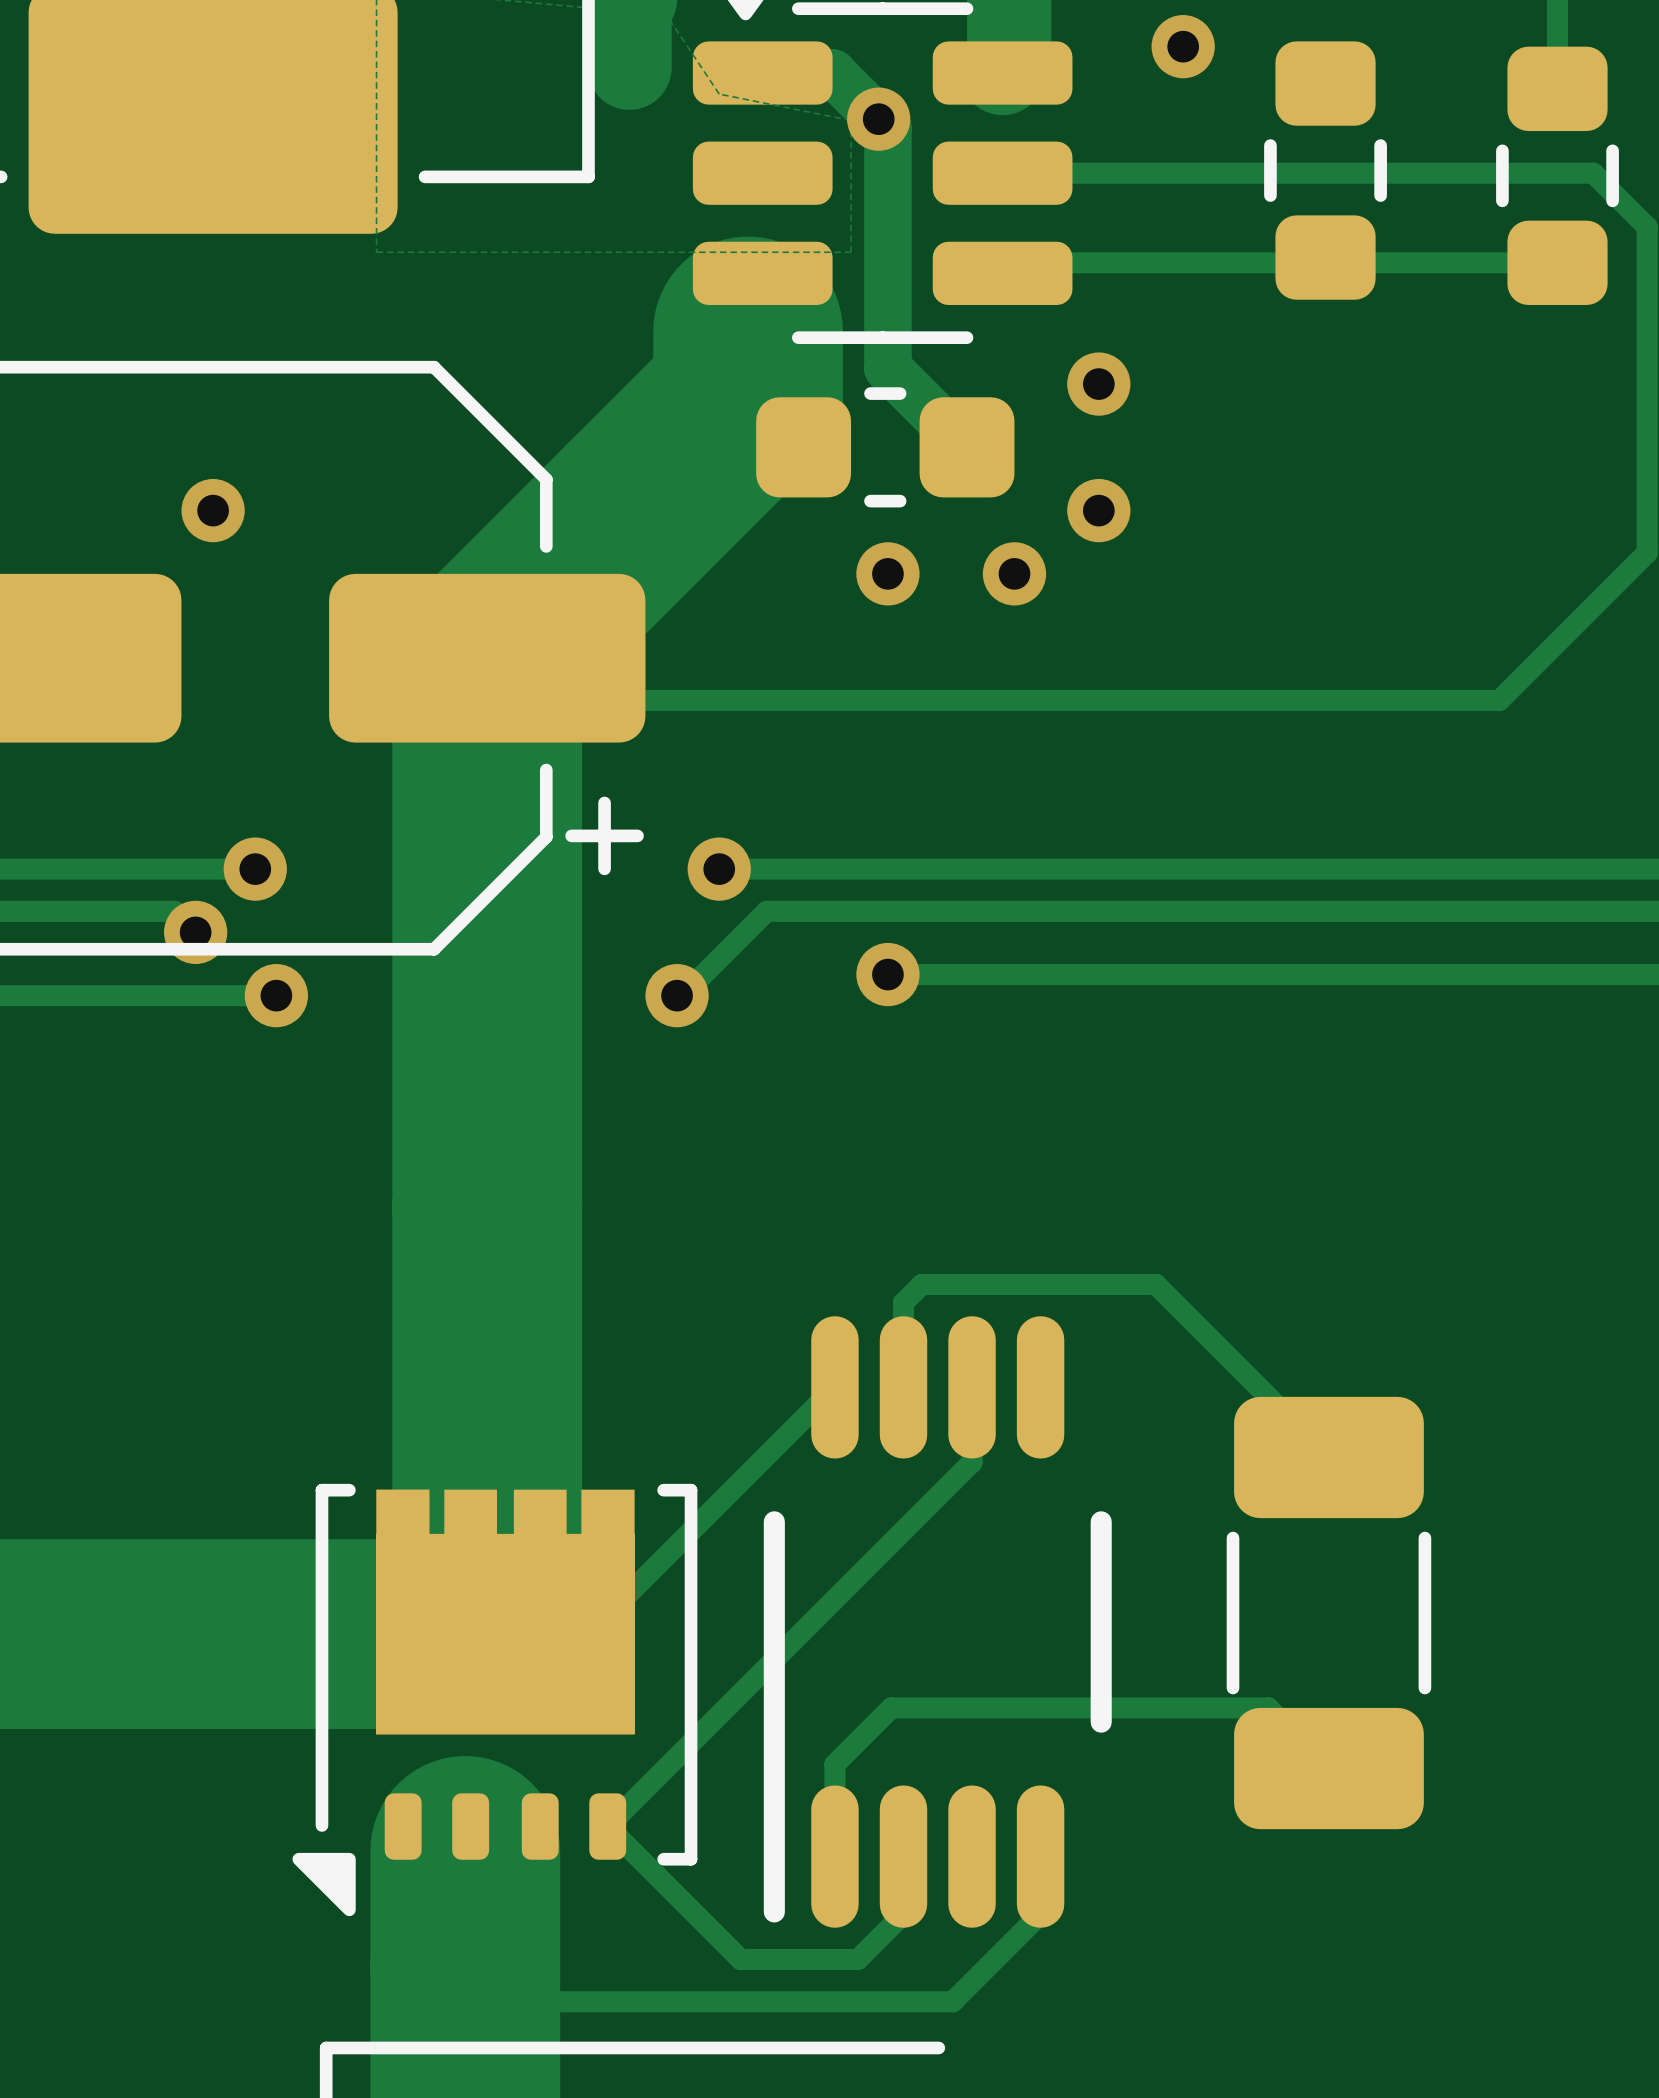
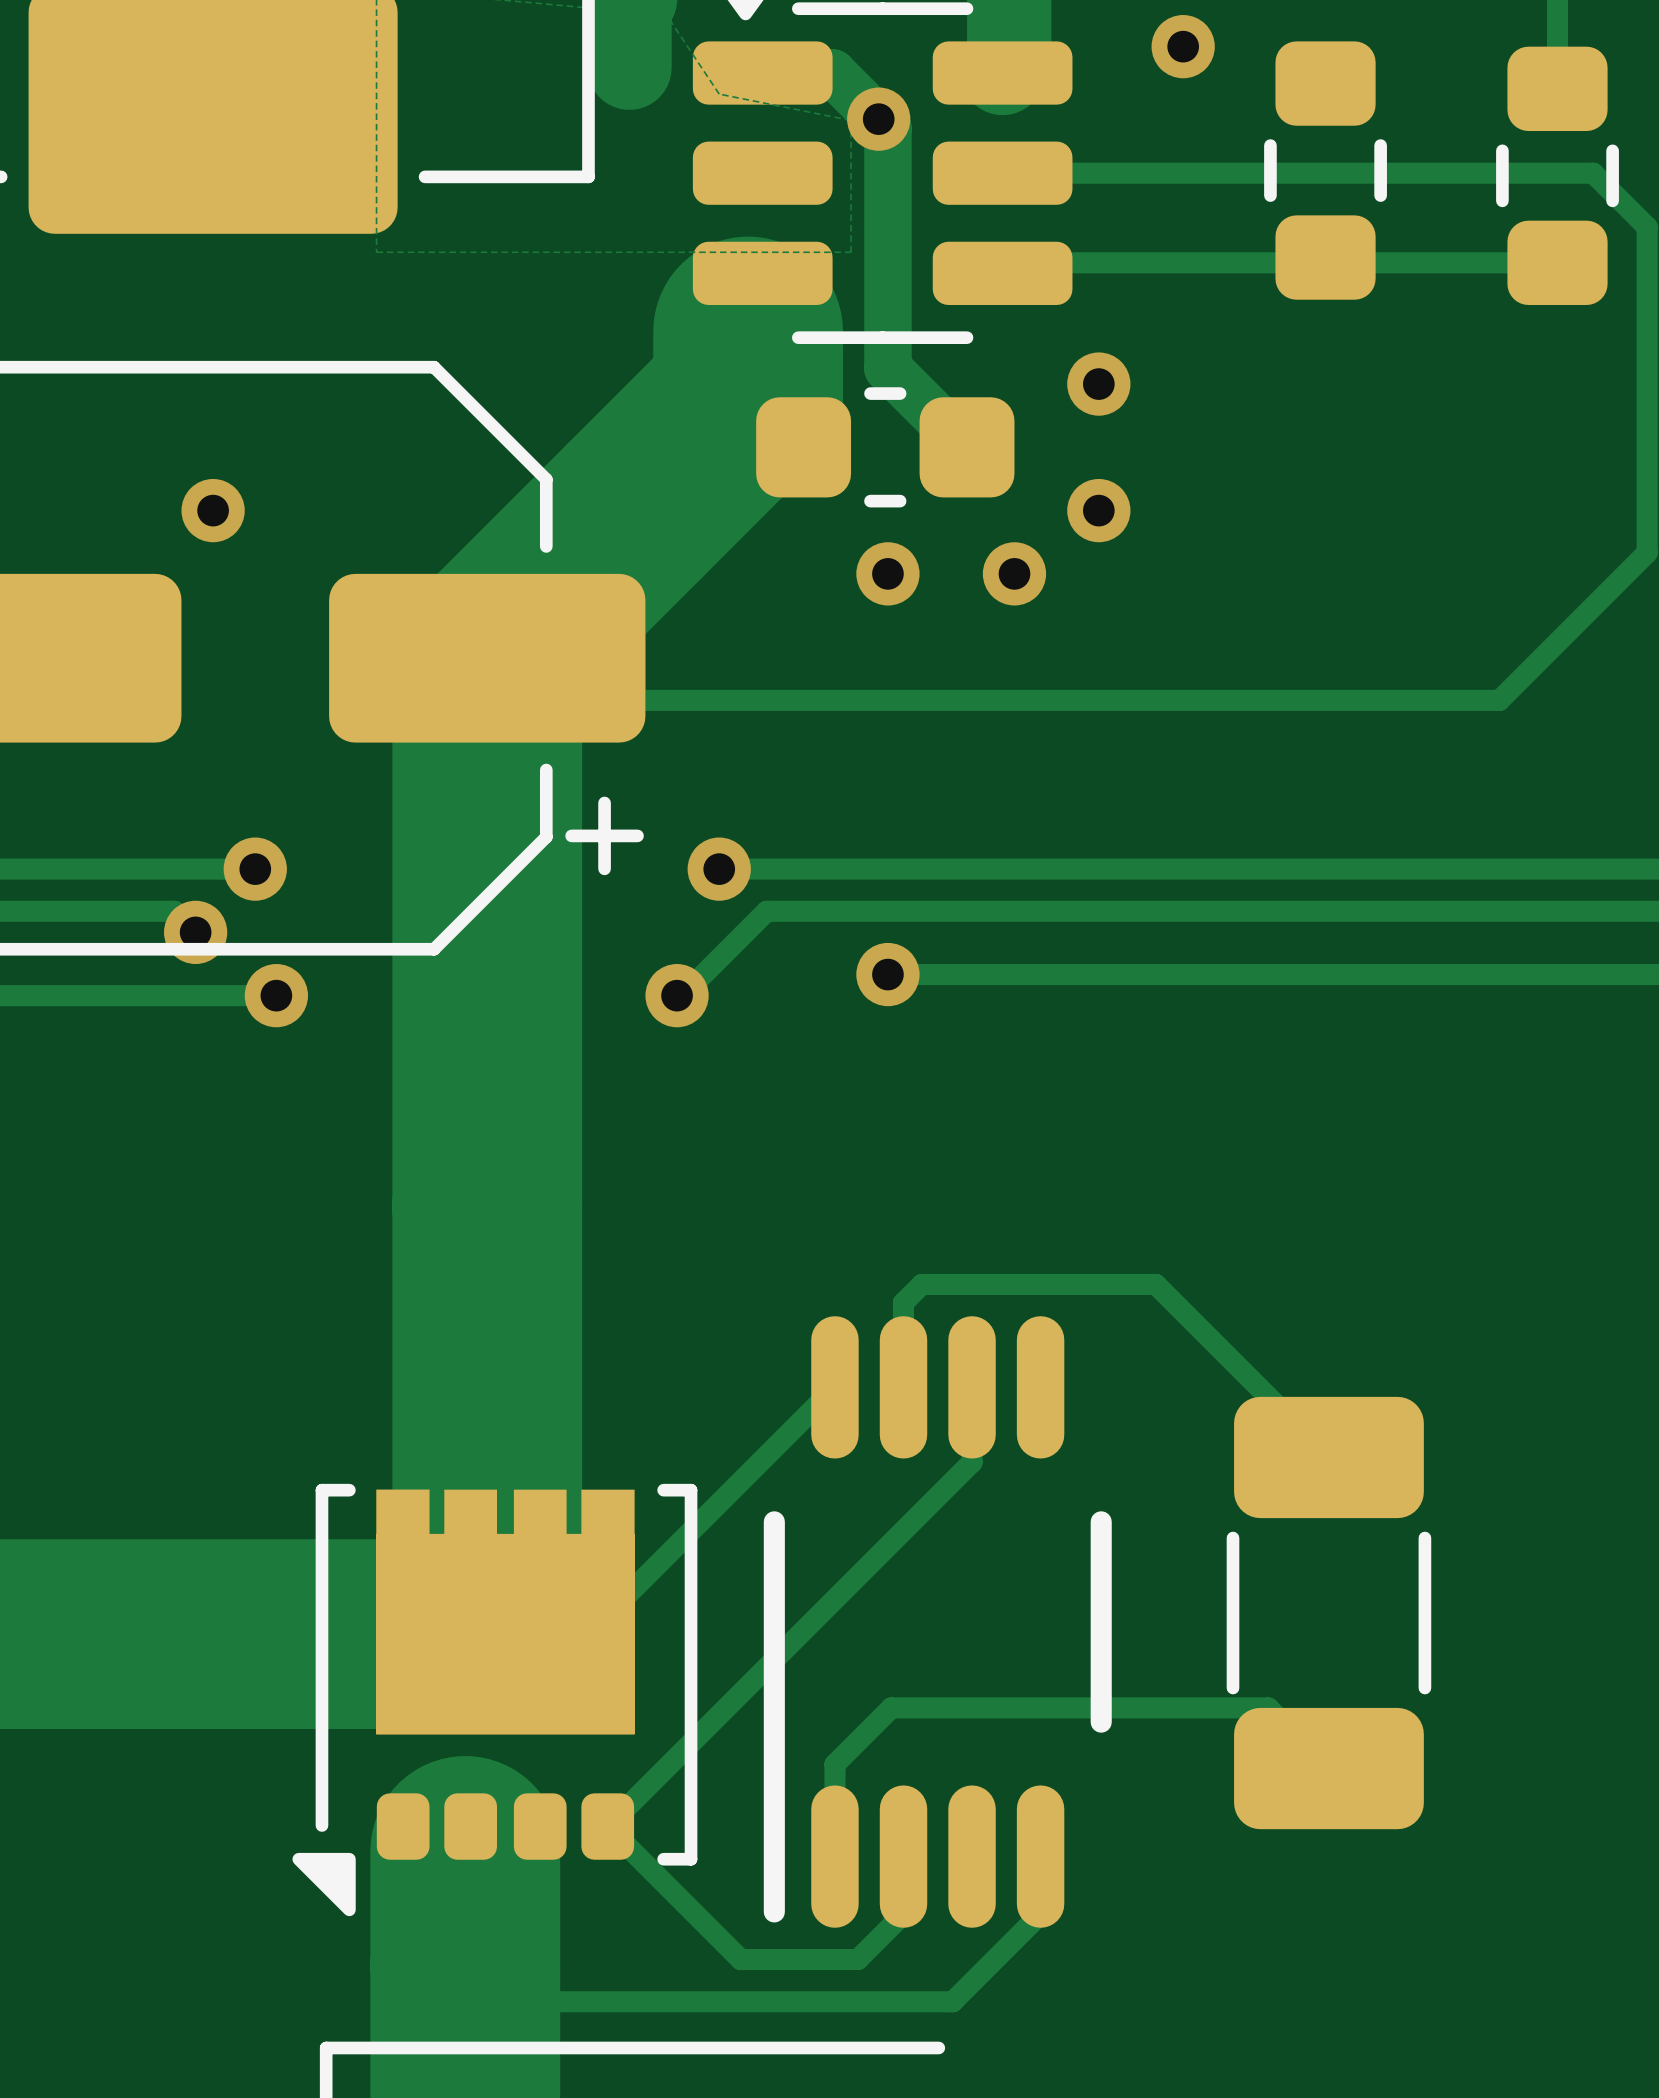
part footprint: [292, 1483, 698, 1917] -> [292, 1483, 698, 1917]

